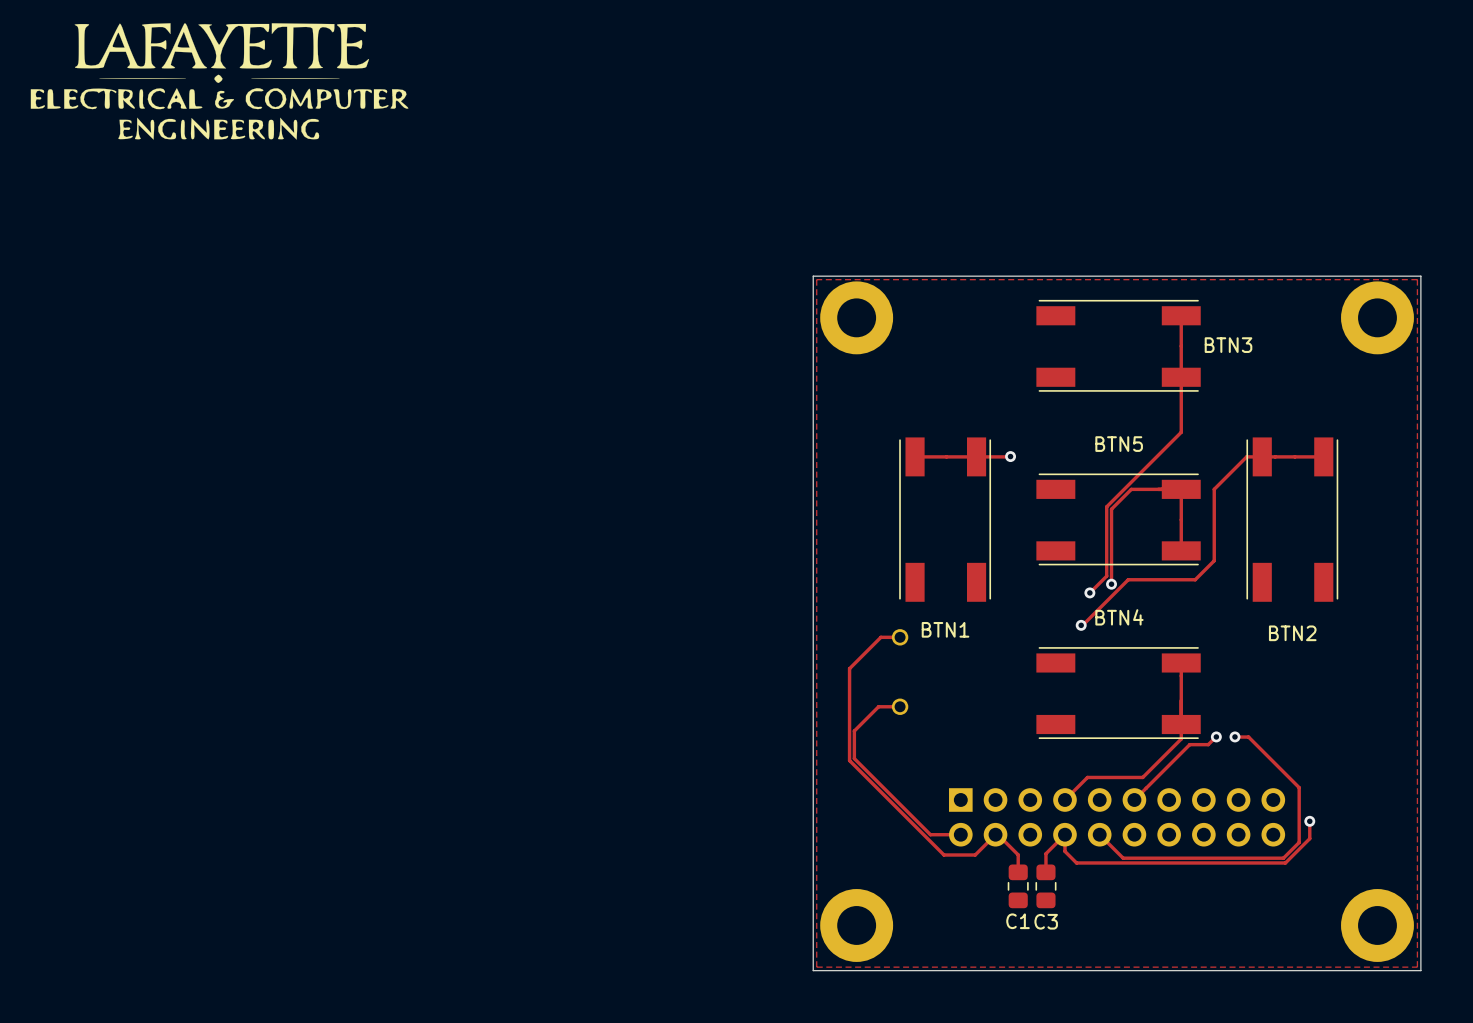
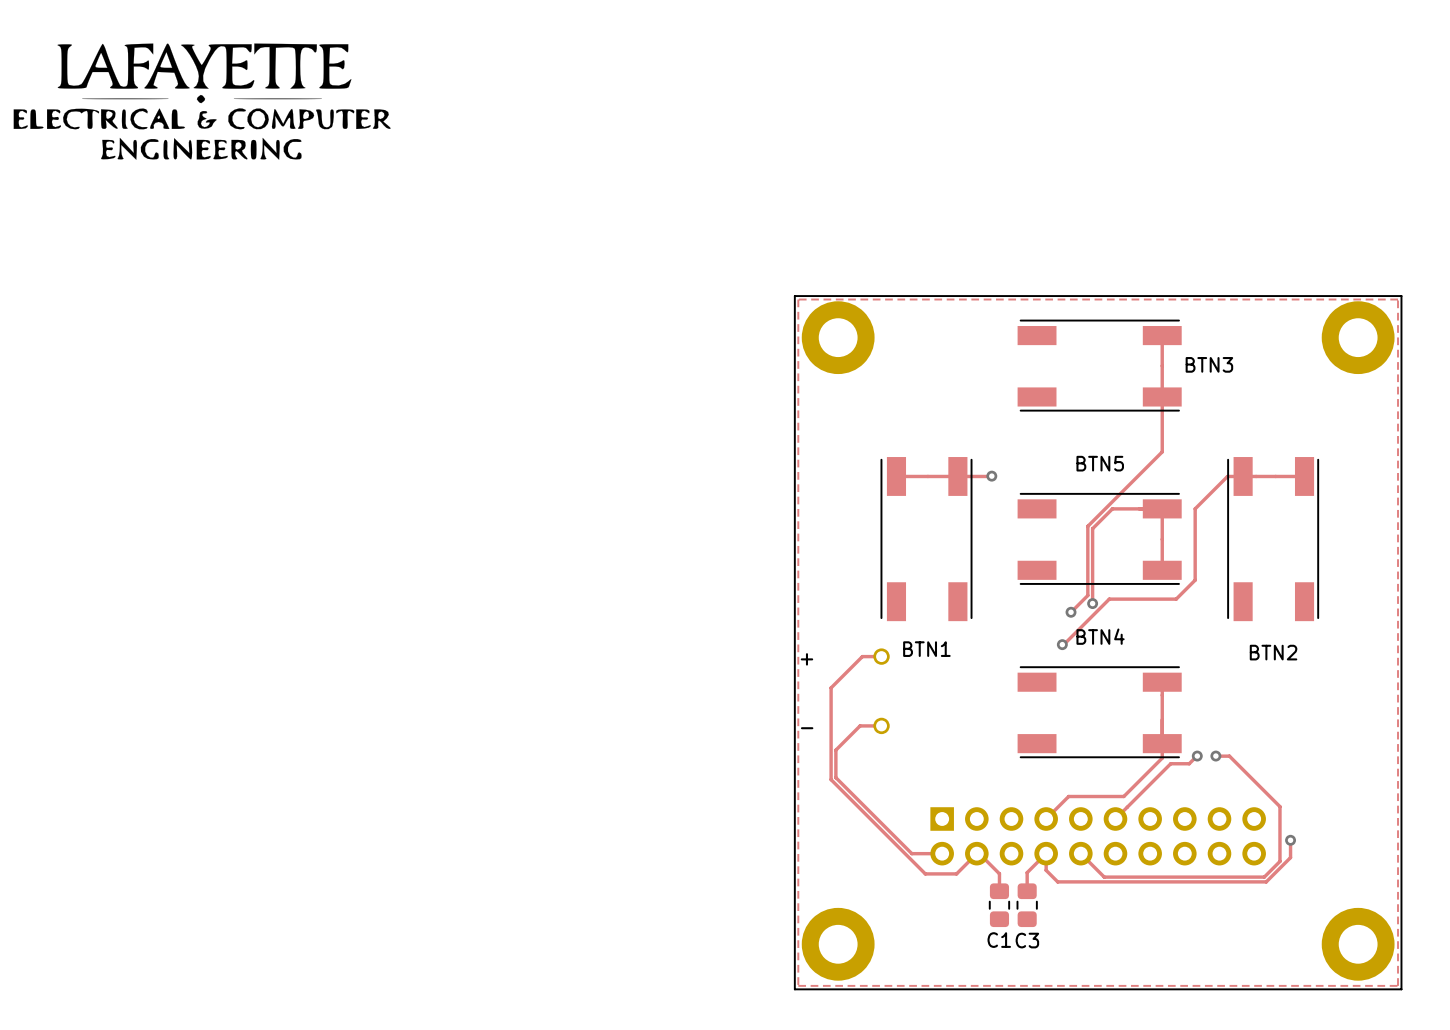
text: none -> + (806, 659)
text: none -> - (807, 728)

